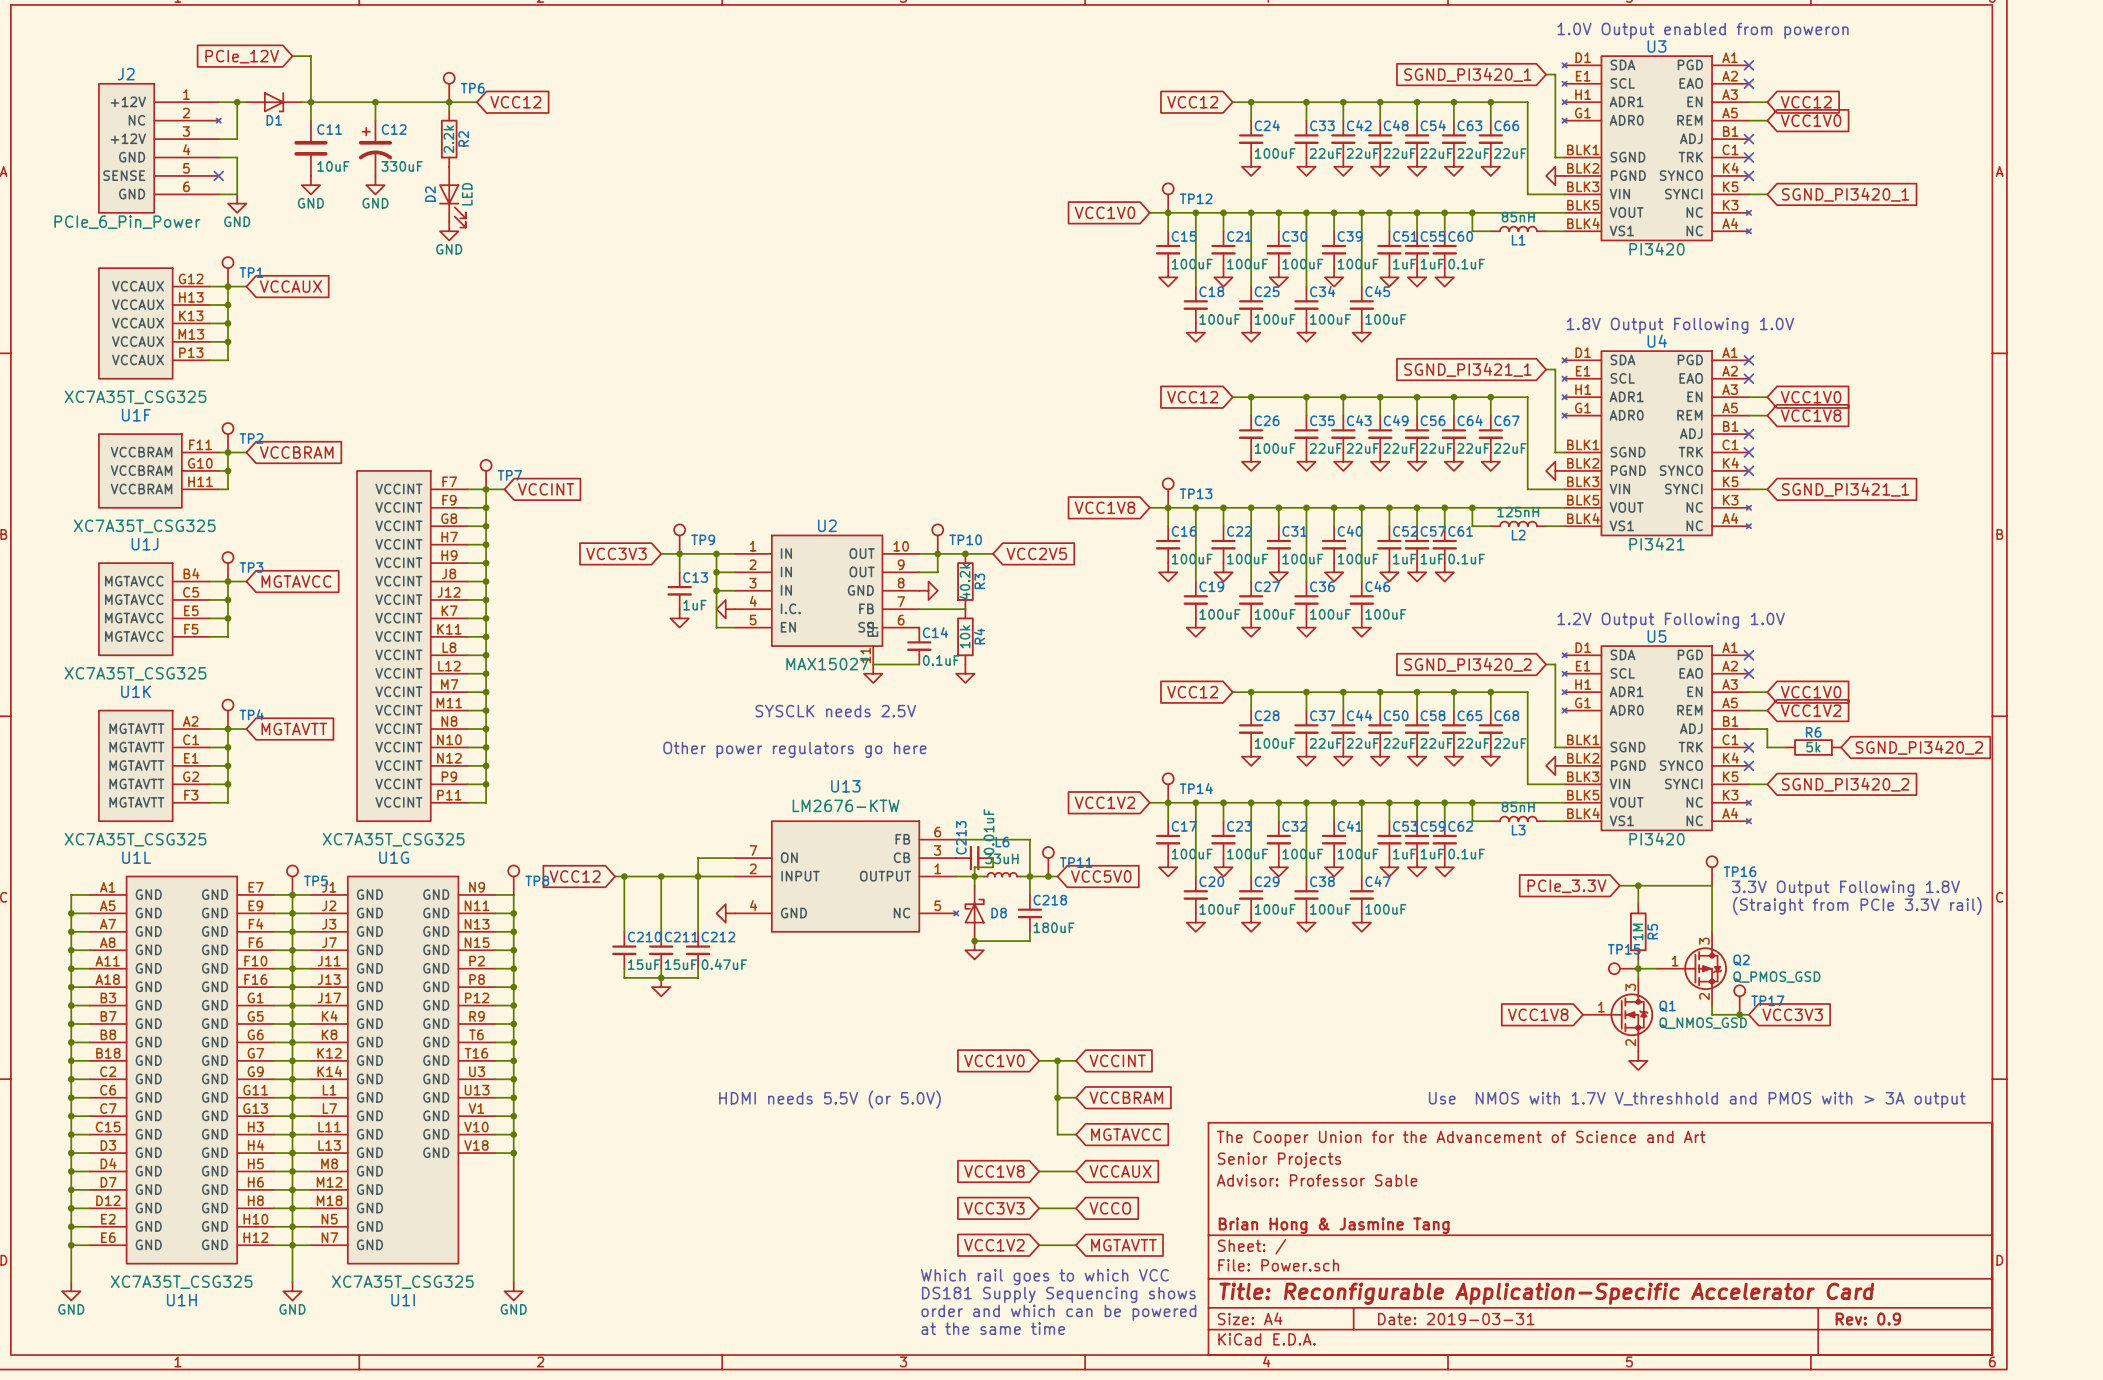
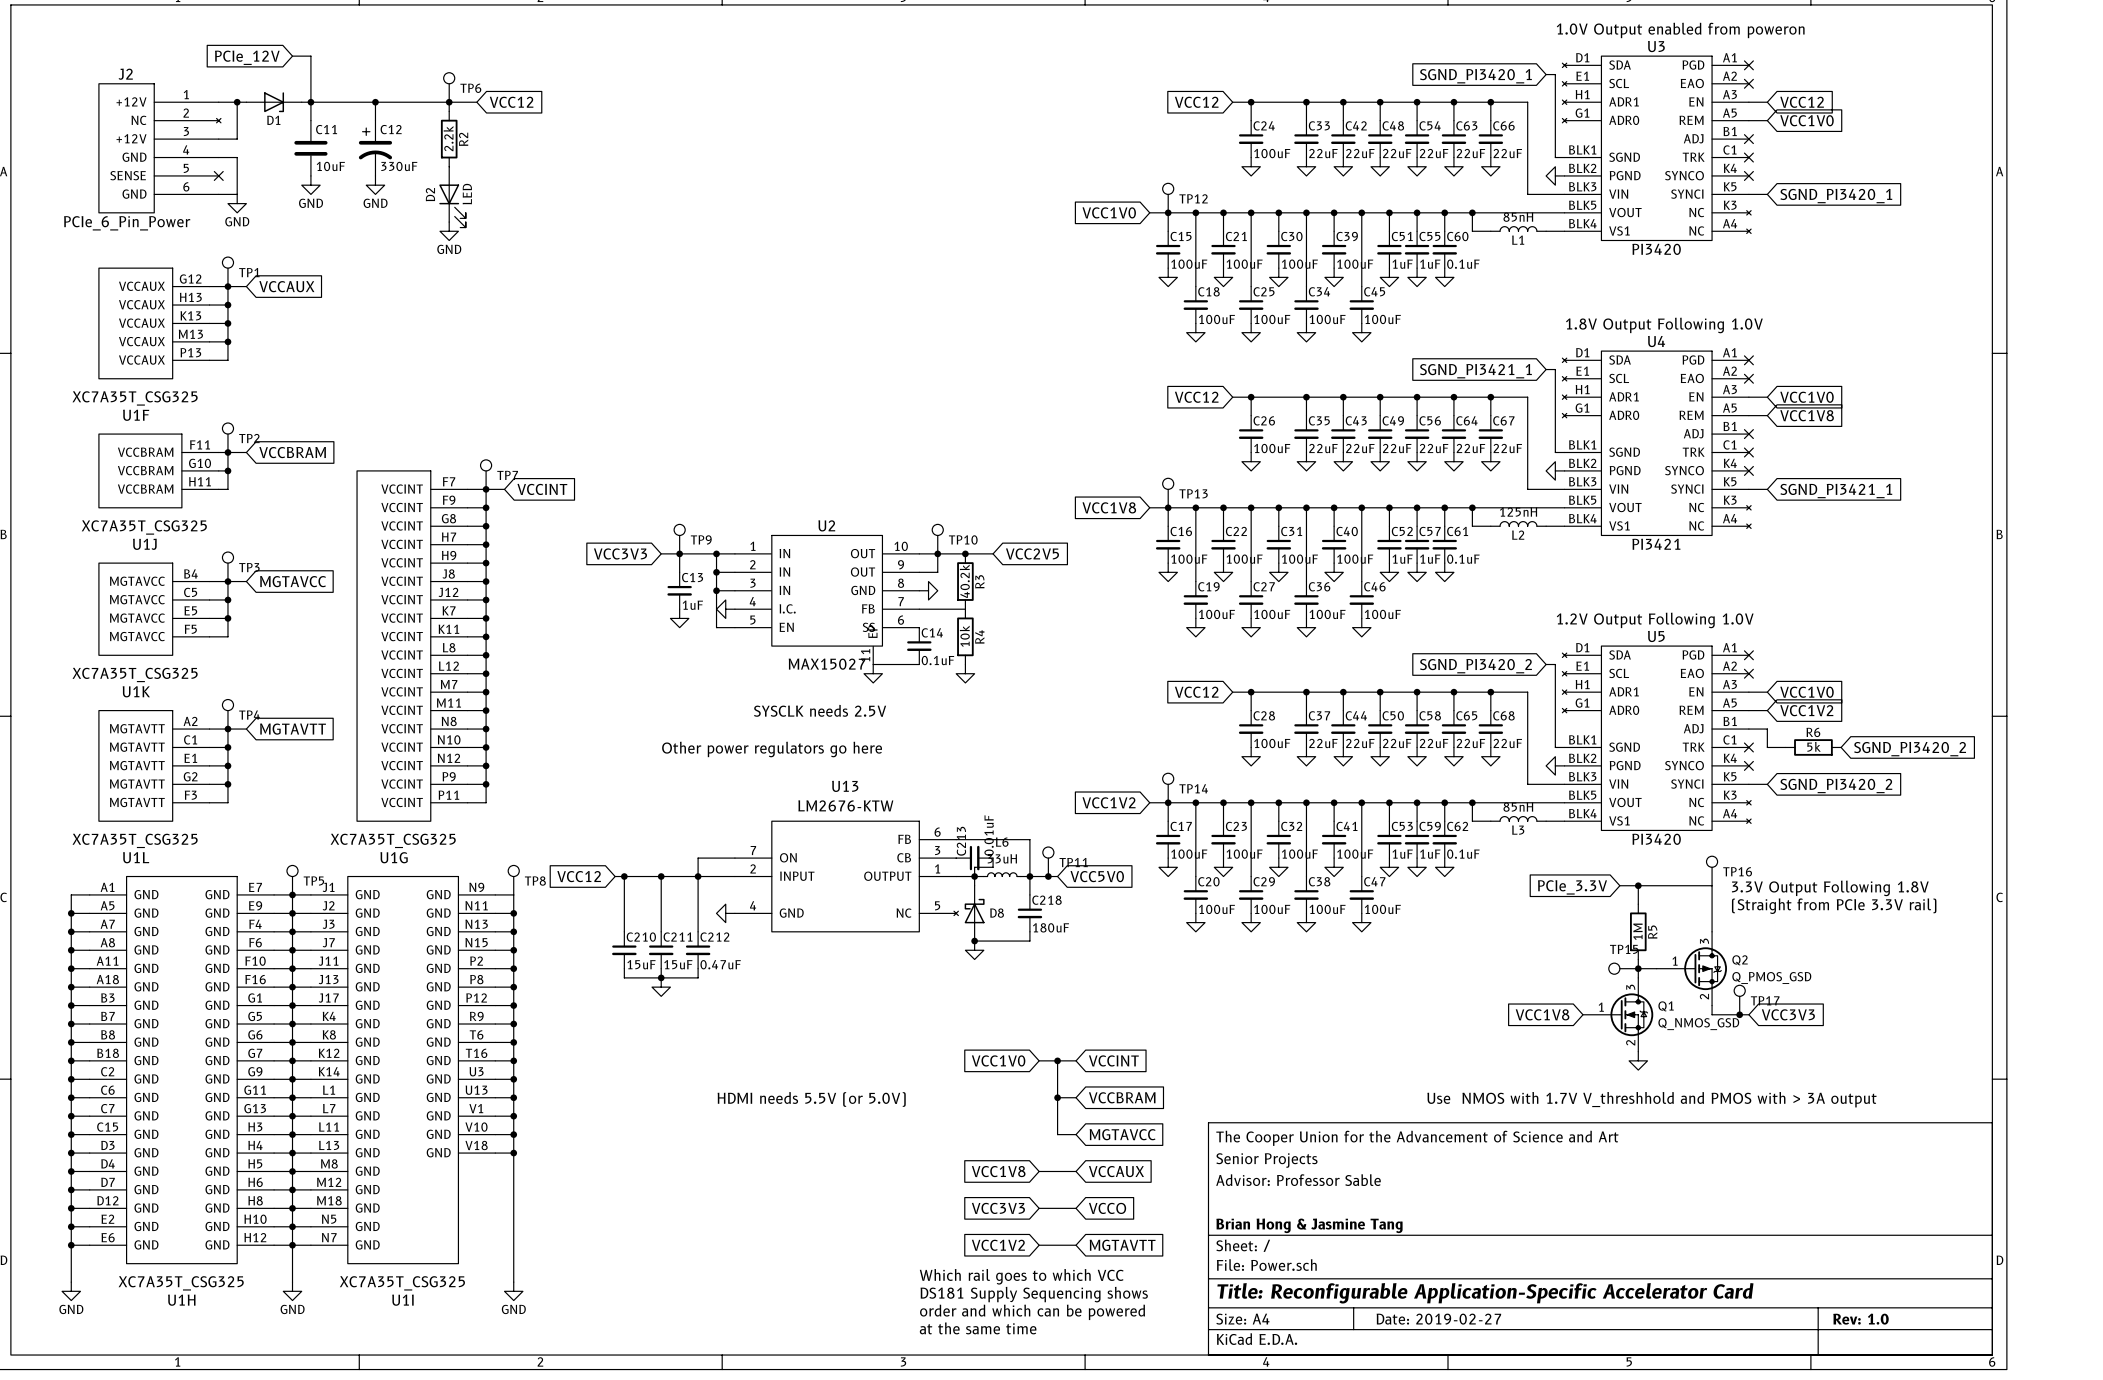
title block: Date: 2019-03-31 (1456, 1319) -> Date: 2019-02-27 (1438, 1319)
title block: Rev: 0.9 (1868, 1319) -> Rev: 1.0 (1861, 1319)

